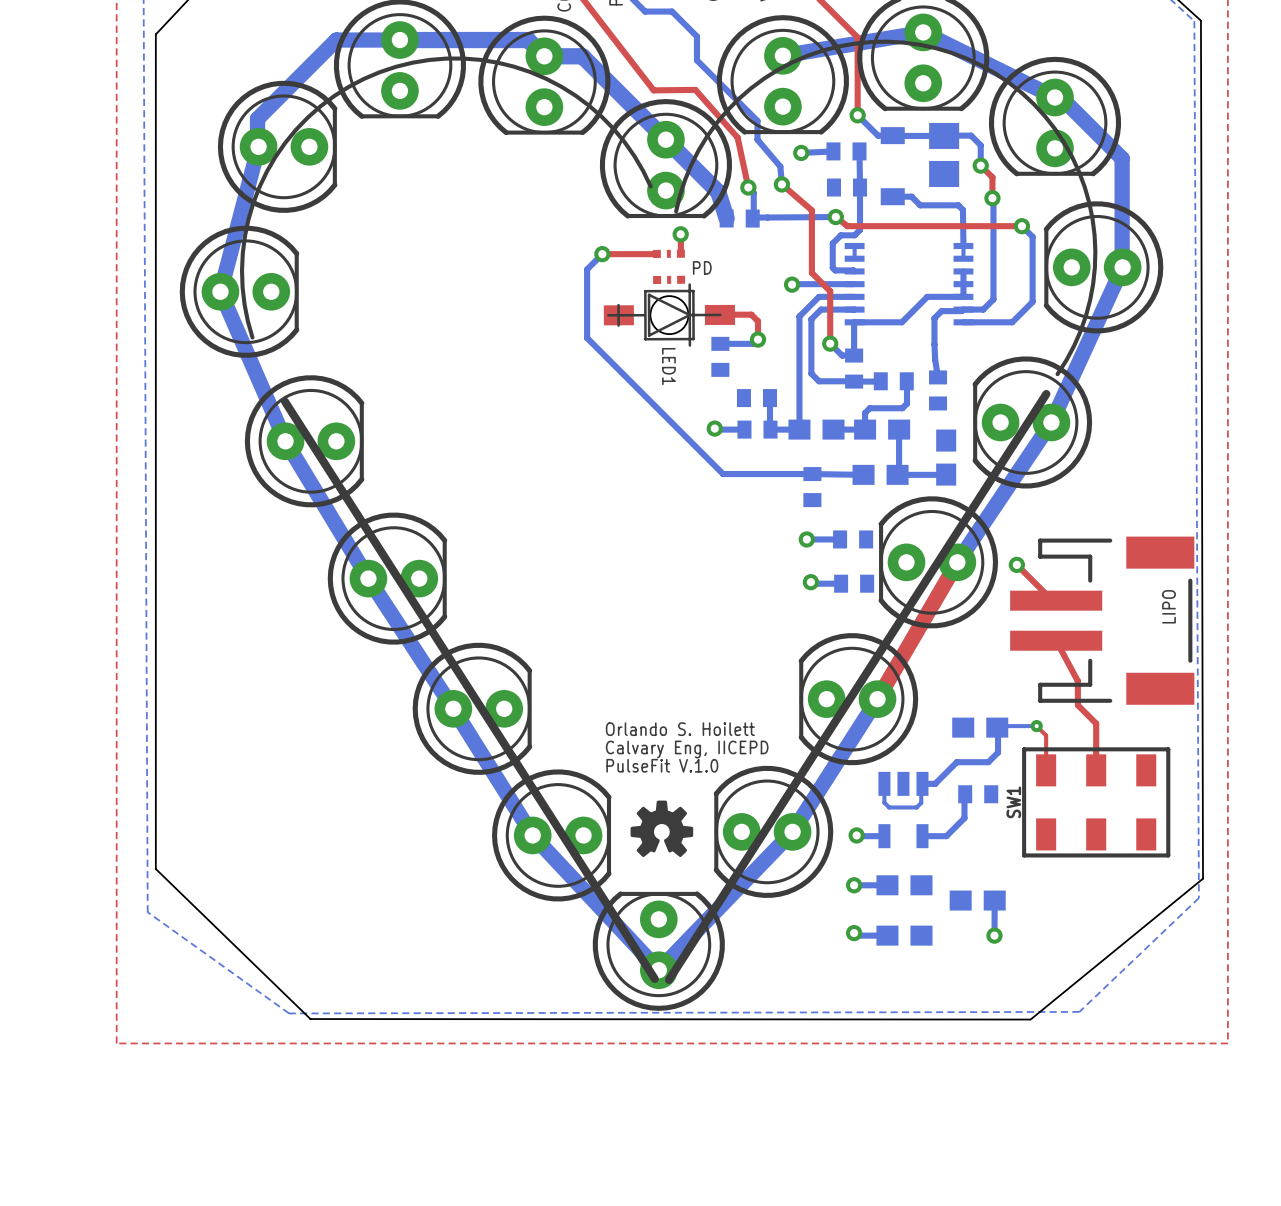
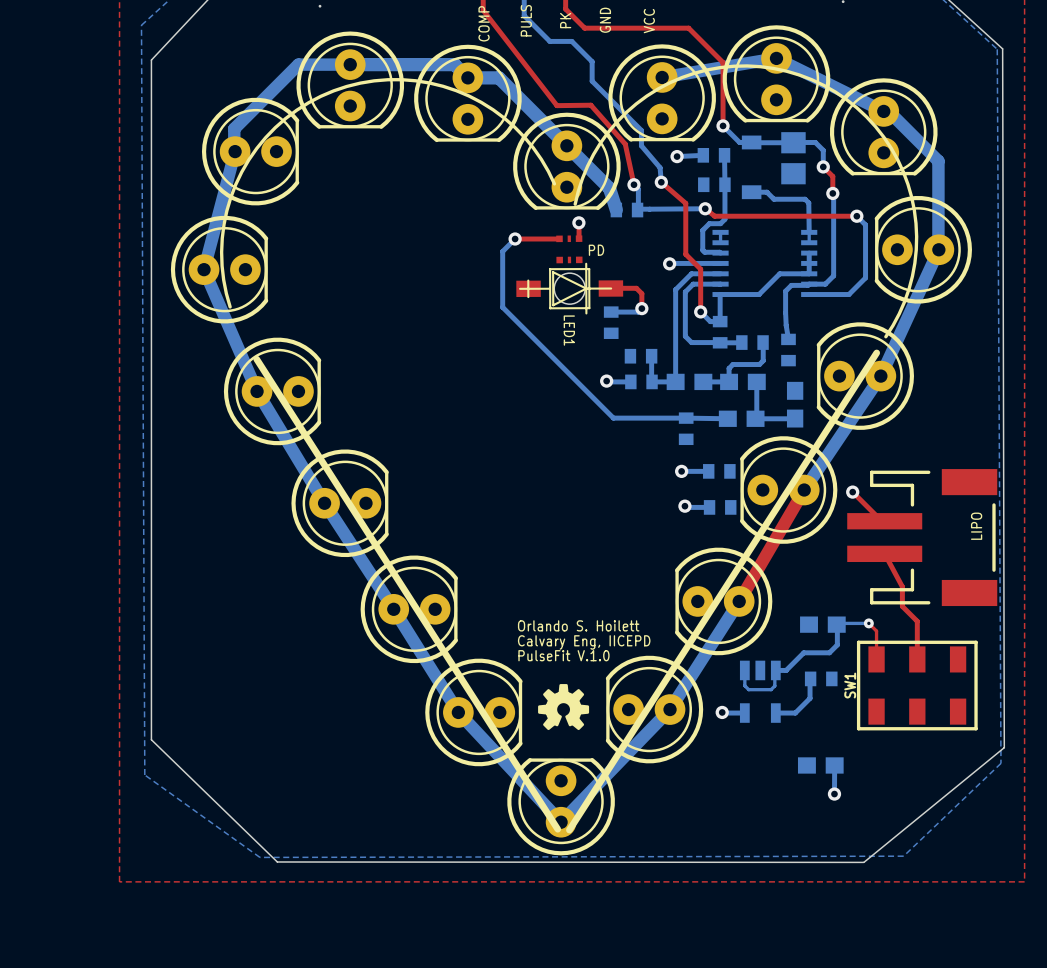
bottom track: (854, 885) (887, 885) -> none
via: (854, 885) -> none
part: (904, 885) -> none
bottom track: (854, 933) (856, 935) (887, 935) -> none
via: (854, 933) -> none
part: (904, 935) -> none

